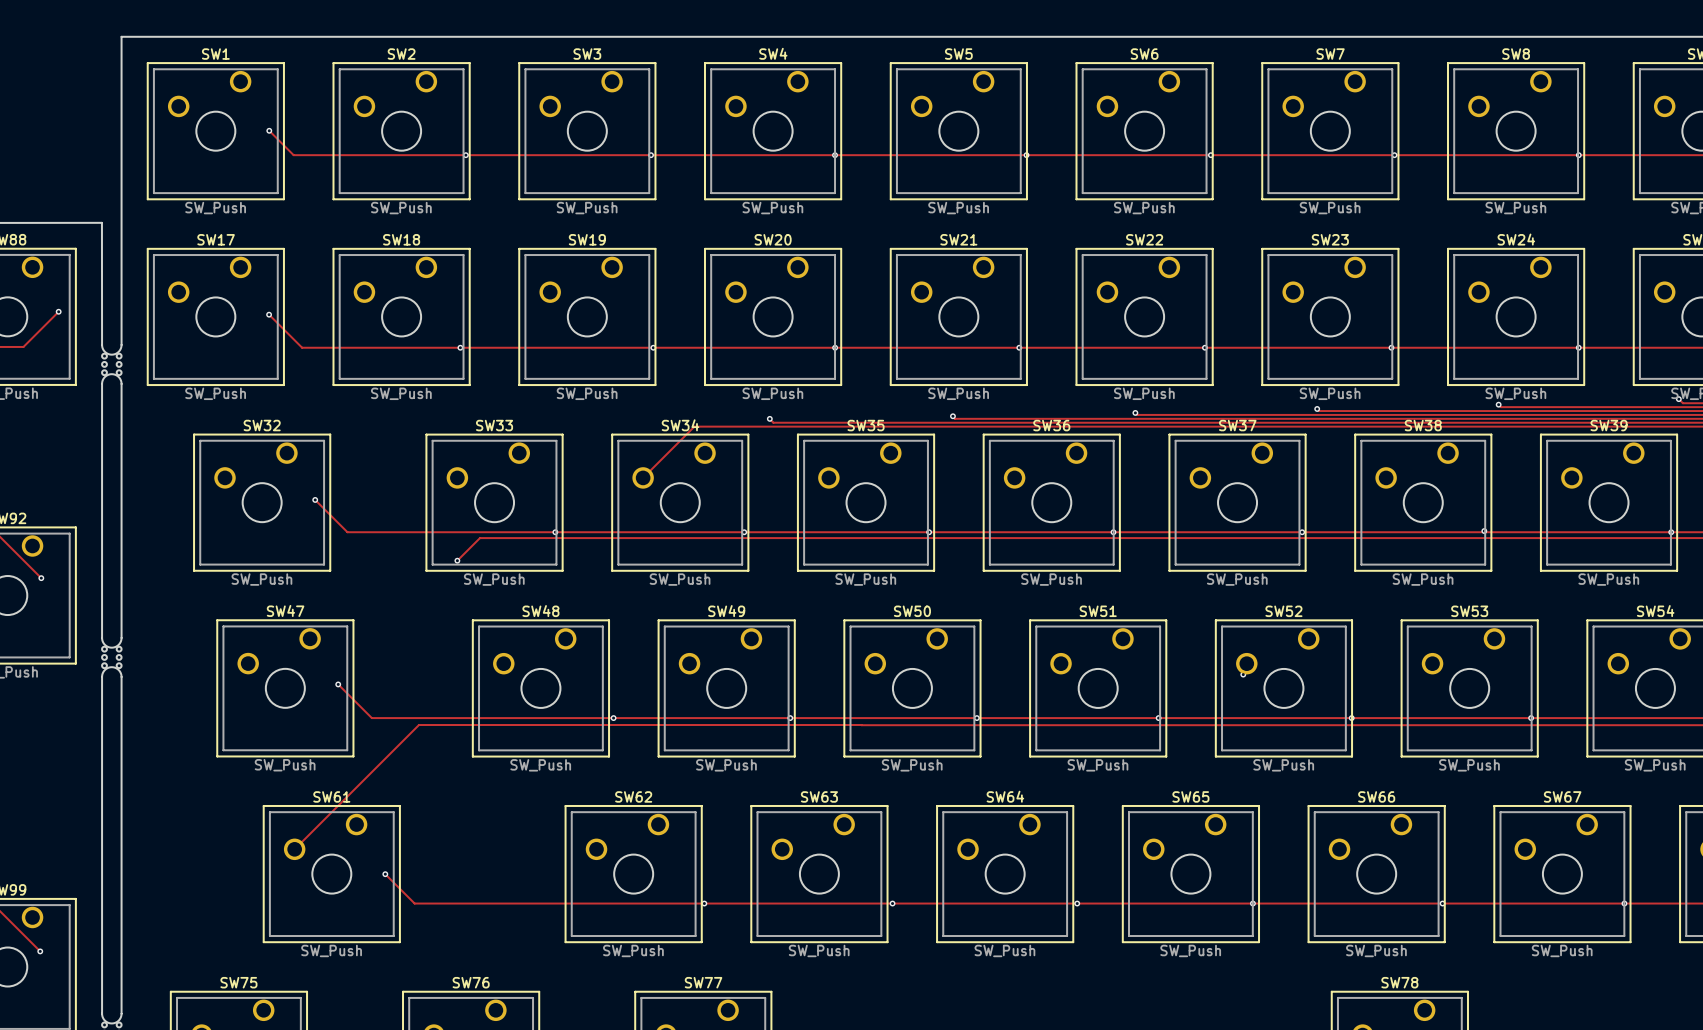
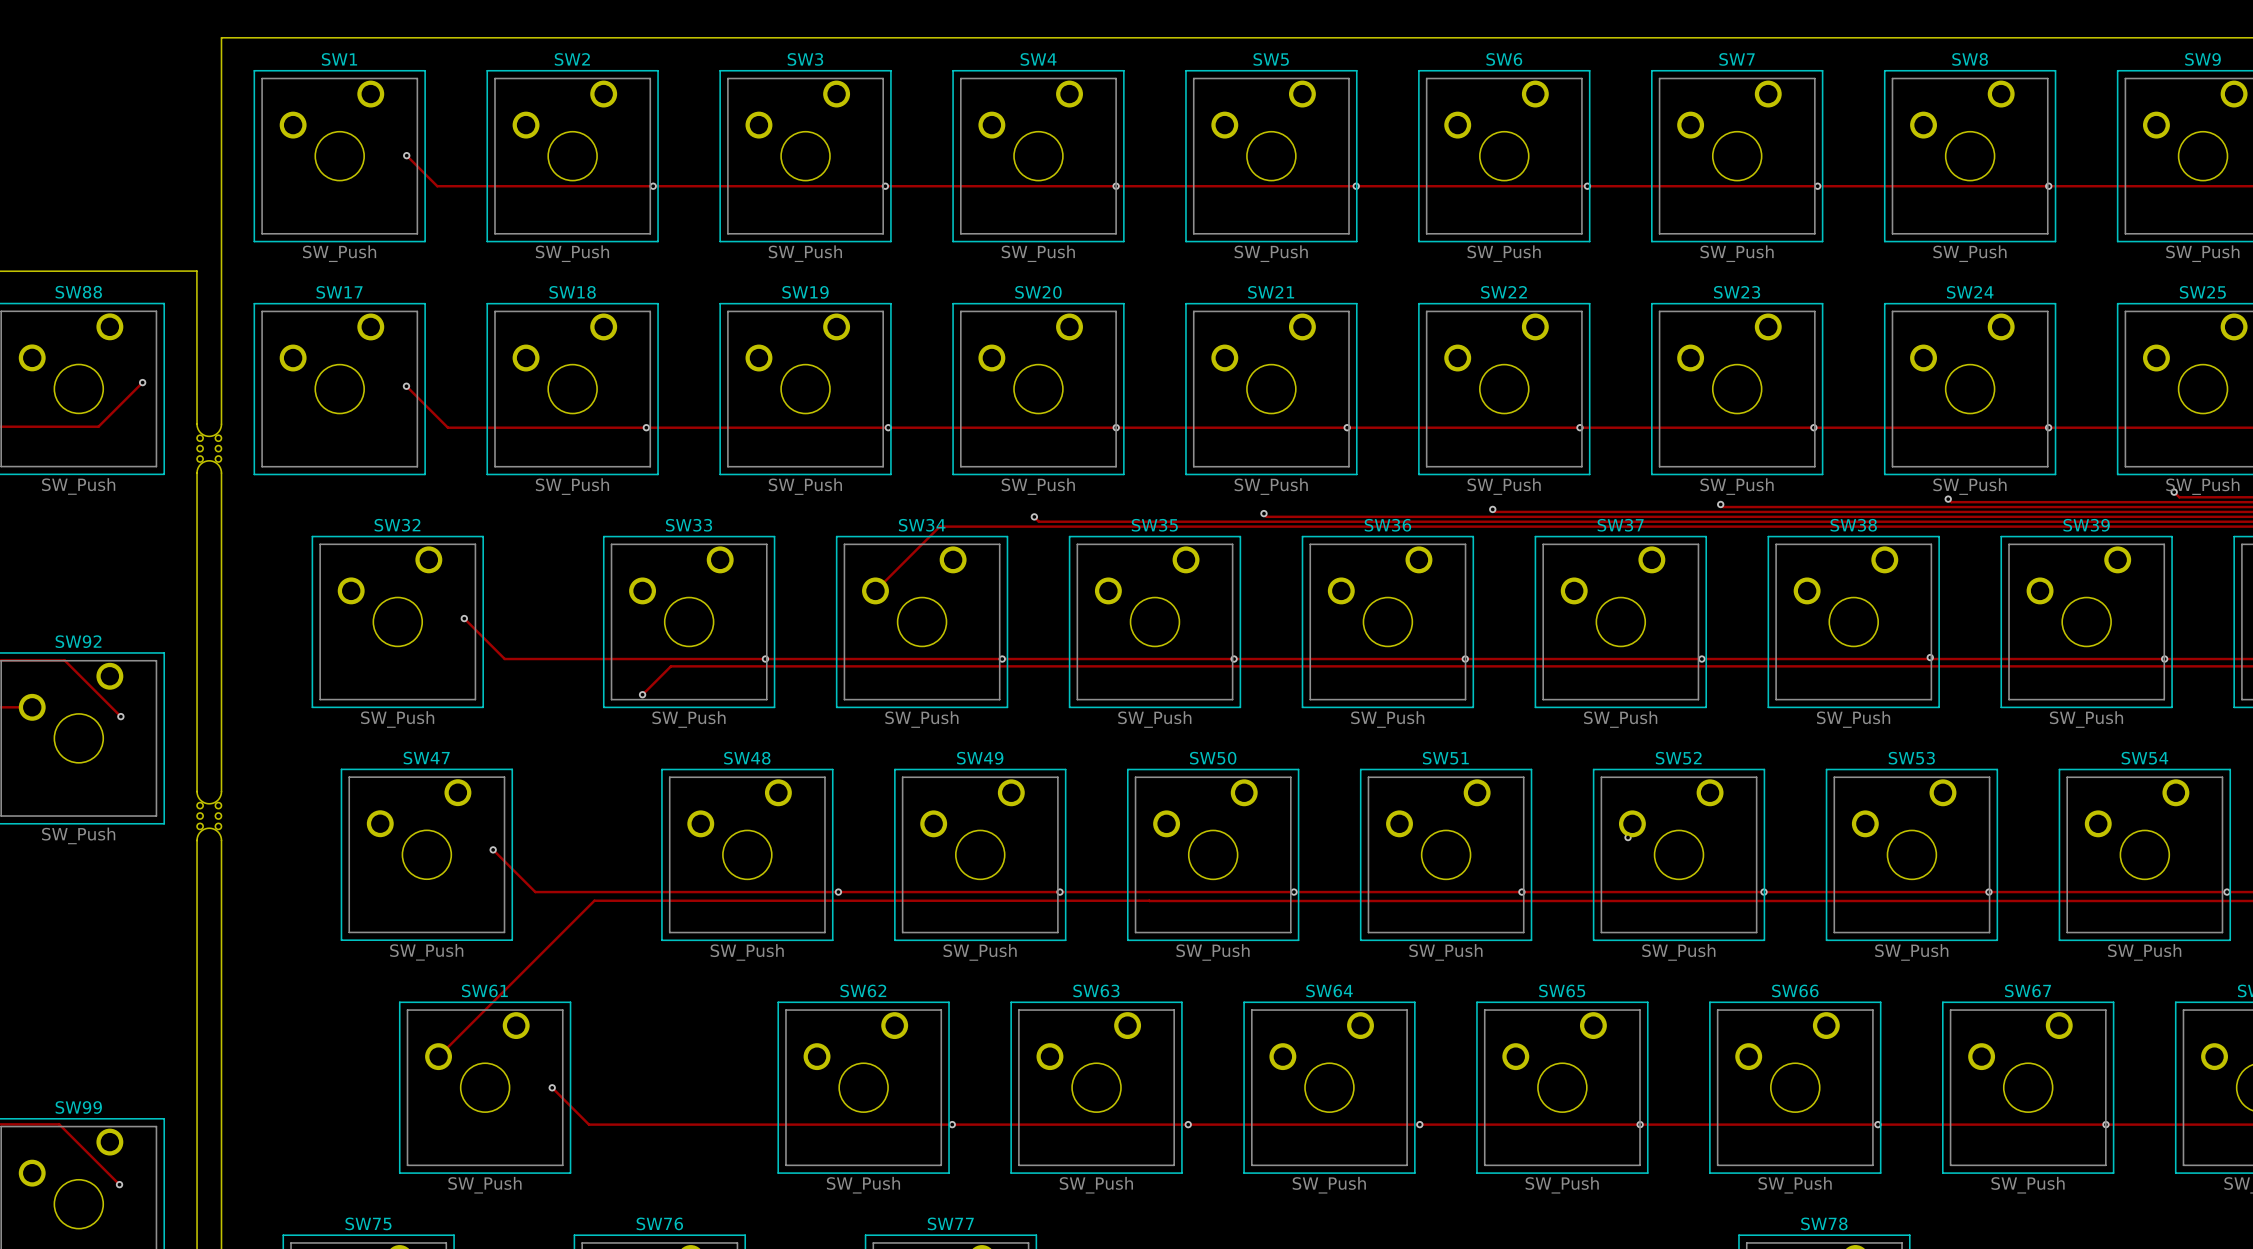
SW17 value: SW_Push (215, 393) -> none

